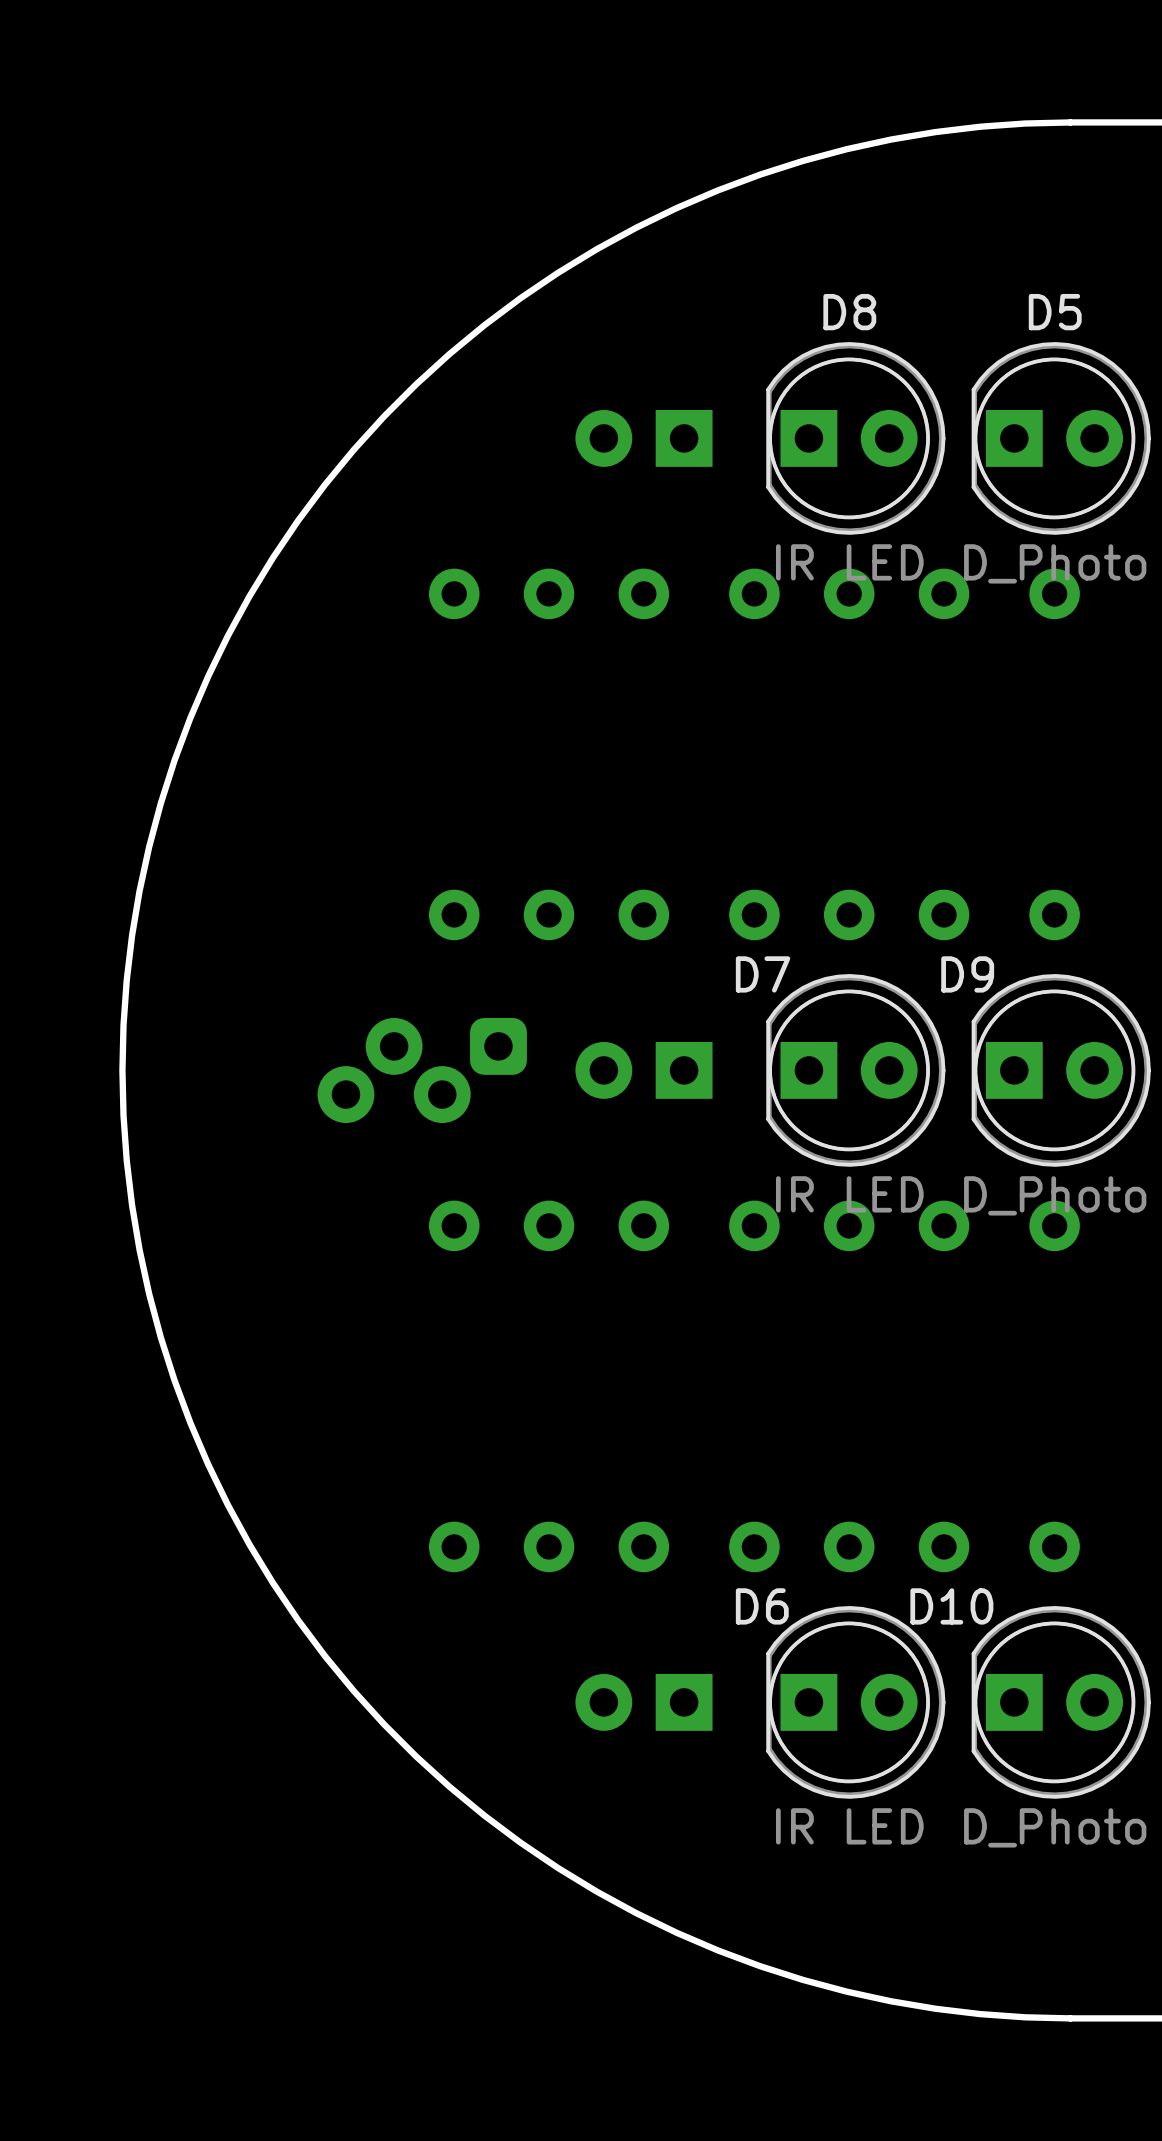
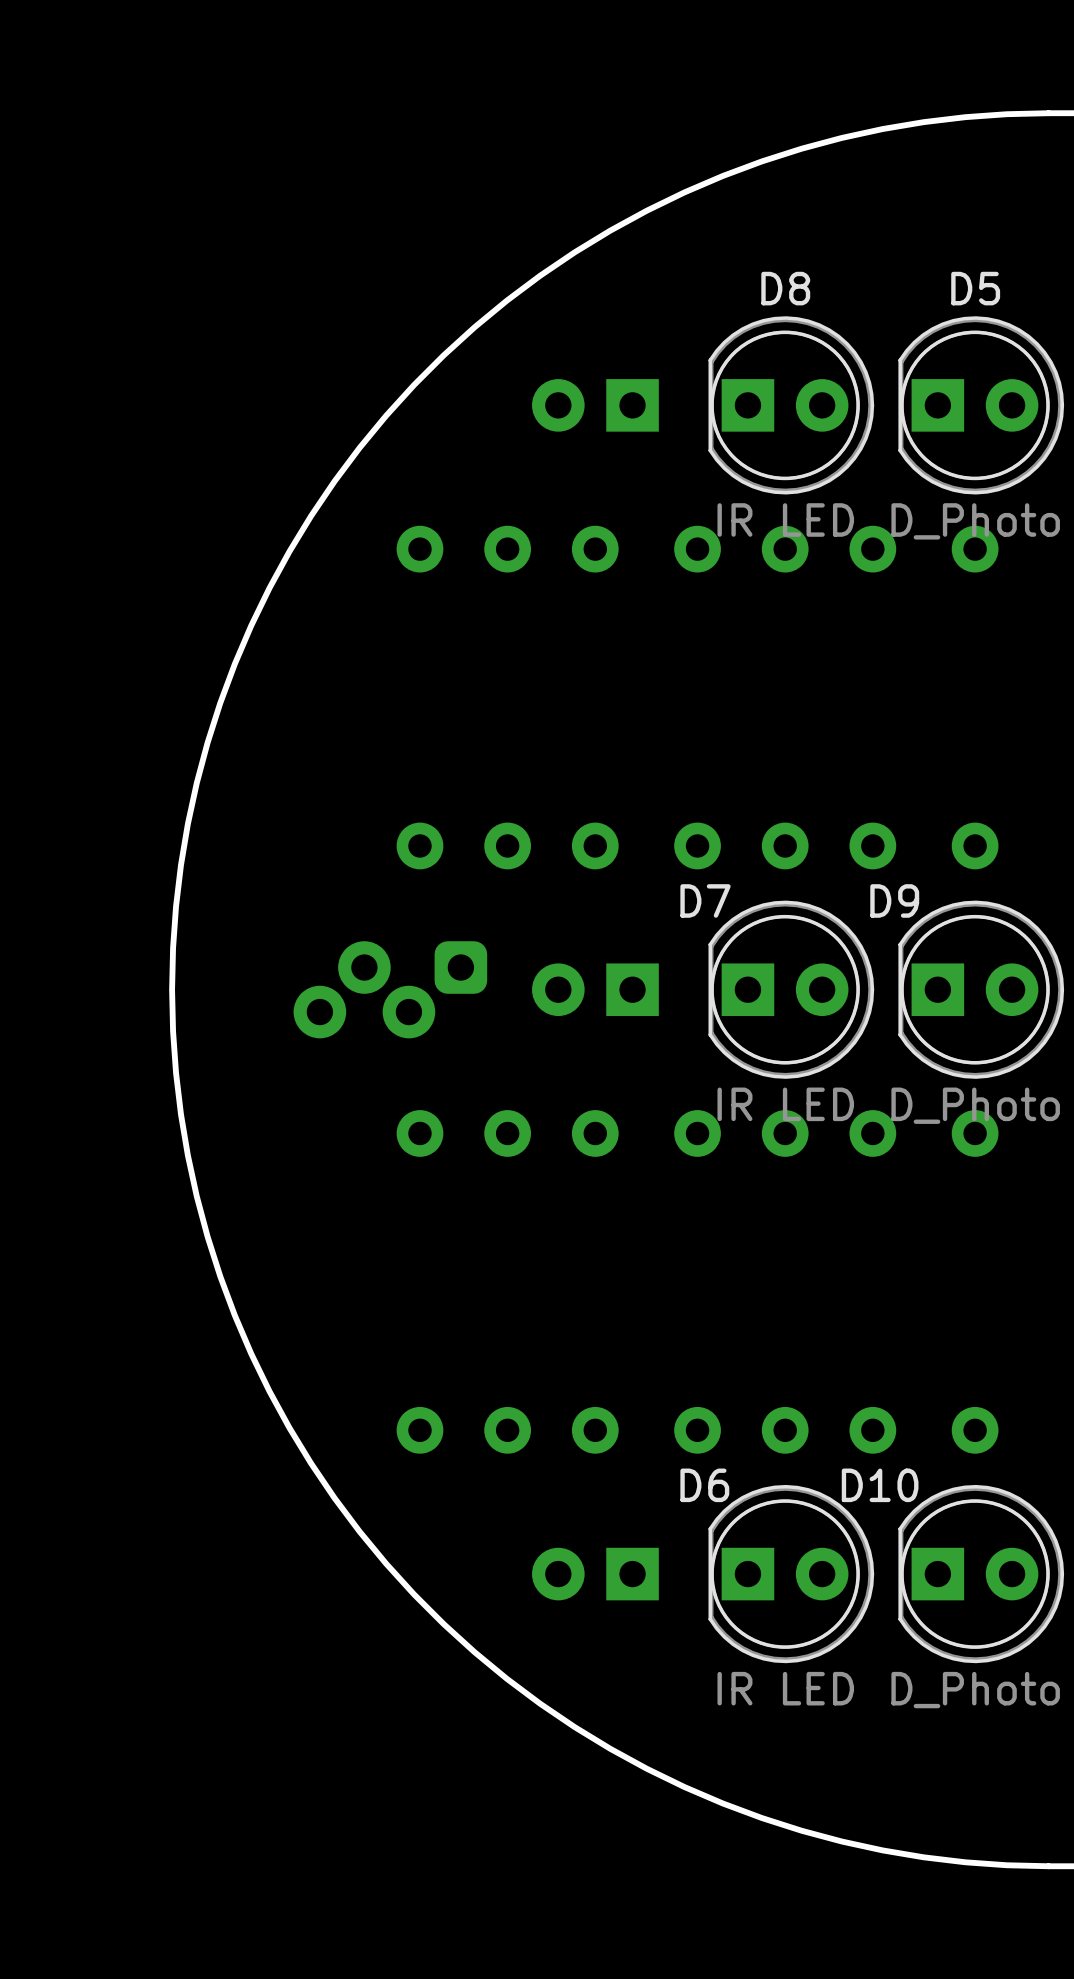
board edge: (1134, 122) (1025, 123) (935, 132) (846, 149) (760, 174) (676, 208) (596, 249) (520, 298) (484, 325) (416, 384) (353, 449) (325, 484) (272, 557) (227, 636) (190, 718) (160, 803) (139, 891) (126, 980) (122, 1070) (126, 1160) (139, 1249) (160, 1337) (174, 1380) (208, 1464) (249, 1544) (298, 1620) (353, 1691) (416, 1756) (484, 1815) (557, 1867) (596, 1891) (676, 1932) (760, 1966) (846, 1991) (935, 2008) (1025, 2017) (1134, 2018) -> (1048, 113) (965, 117) (882, 129) (801, 148) (722, 175) (646, 210) (574, 252) (506, 300) (443, 355) (386, 415) (334, 481) (289, 551) (251, 625) (220, 703) (196, 783) (187, 823) (176, 906) (172, 989) (176, 1073) (187, 1155) (207, 1236) (234, 1315) (269, 1391) (311, 1463) (359, 1531) (414, 1594) (474, 1652) (540, 1703) (610, 1748) (684, 1787) (761, 1818) (801, 1830) (882, 1850) (965, 1862) (1048, 1866)

